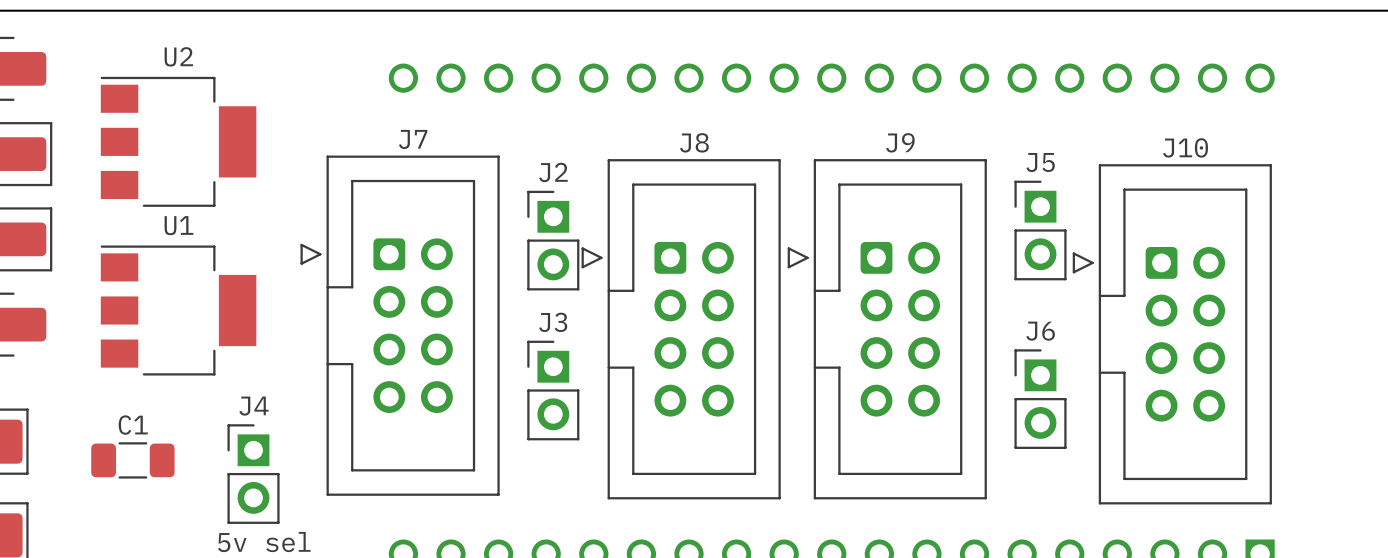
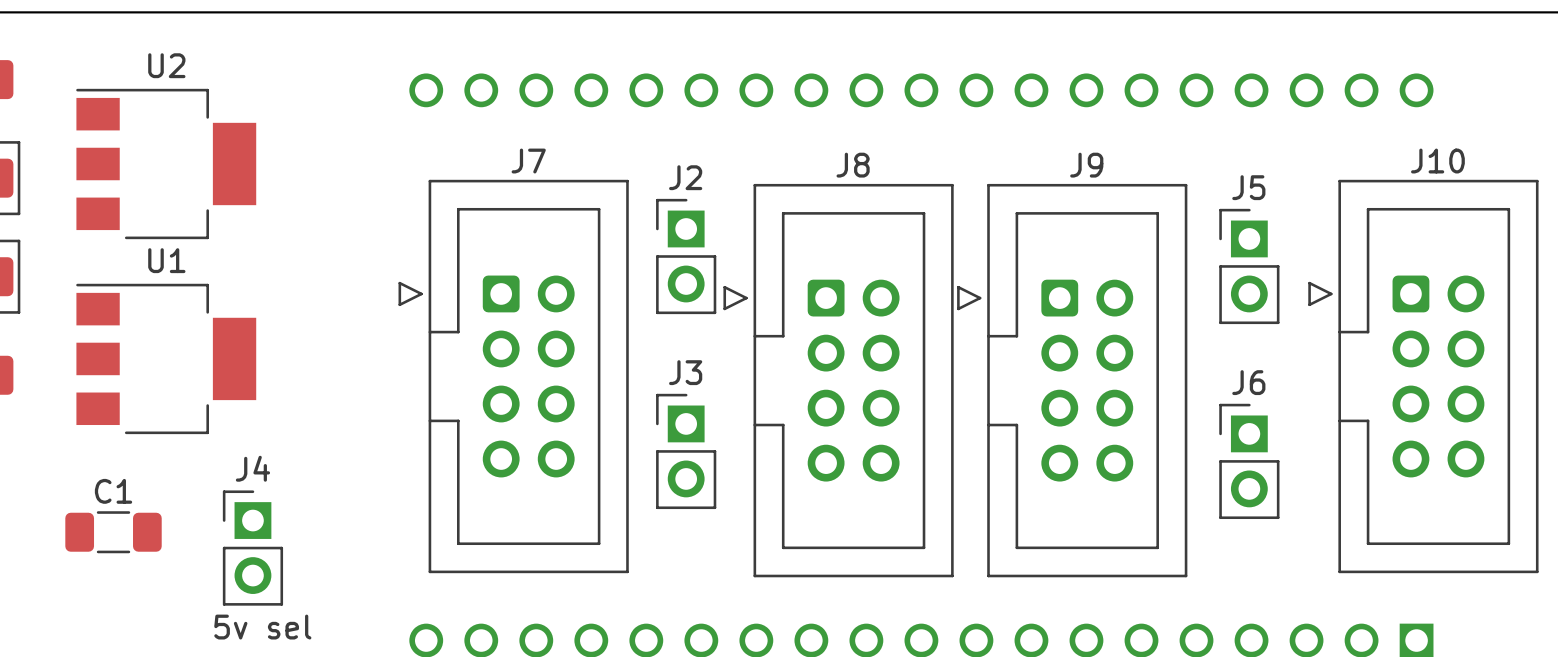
J5 position: (1040, 230) -> (1249, 266)
J2 position: (553, 240) -> (686, 256)
J7 position: (400, 325) -> (513, 376)
J8 position: (681, 329) -> (838, 380)
J9 position: (887, 329) -> (1072, 380)
J10 position: (1172, 334) -> (1423, 376)
J3 position: (553, 390) -> (686, 451)
J6 position: (1040, 399) -> (1249, 461)

